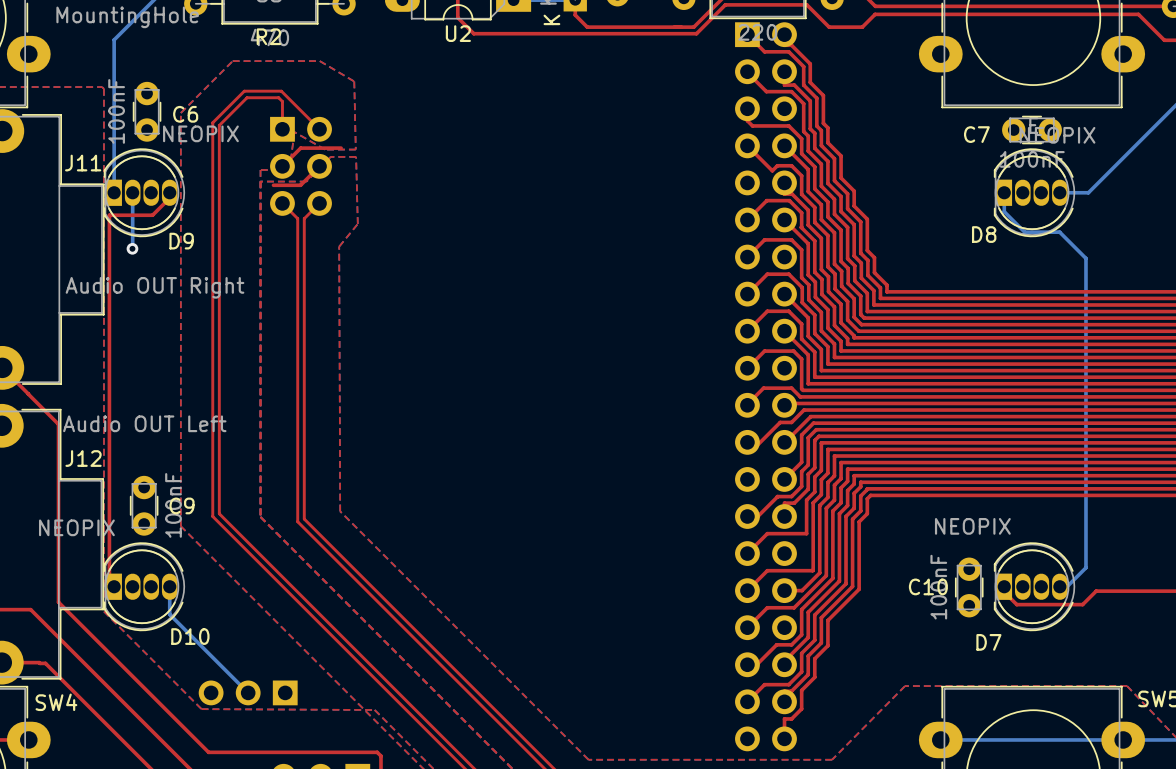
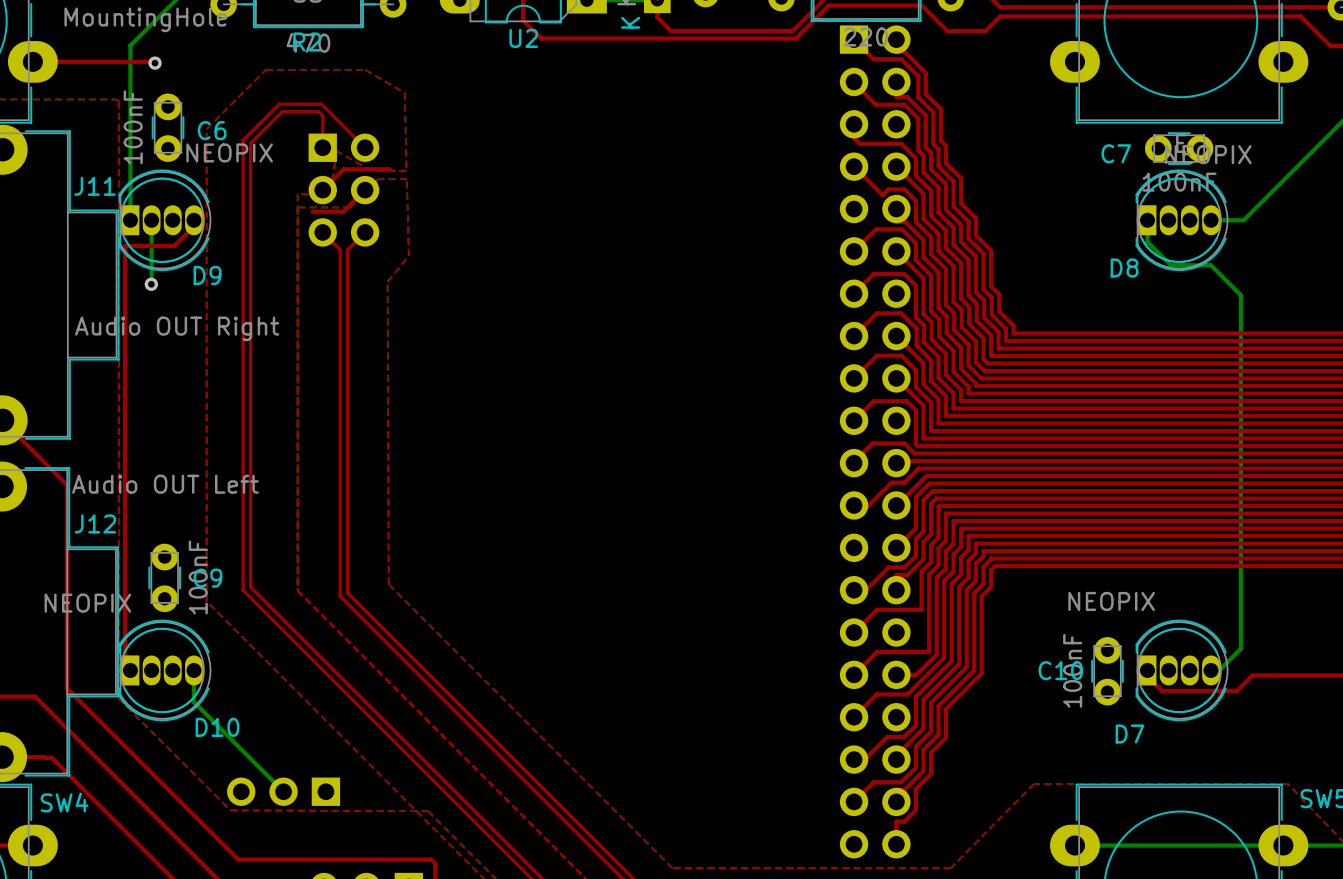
top track: none -> (32, 61) (155, 63)
via: none -> (155, 63)

